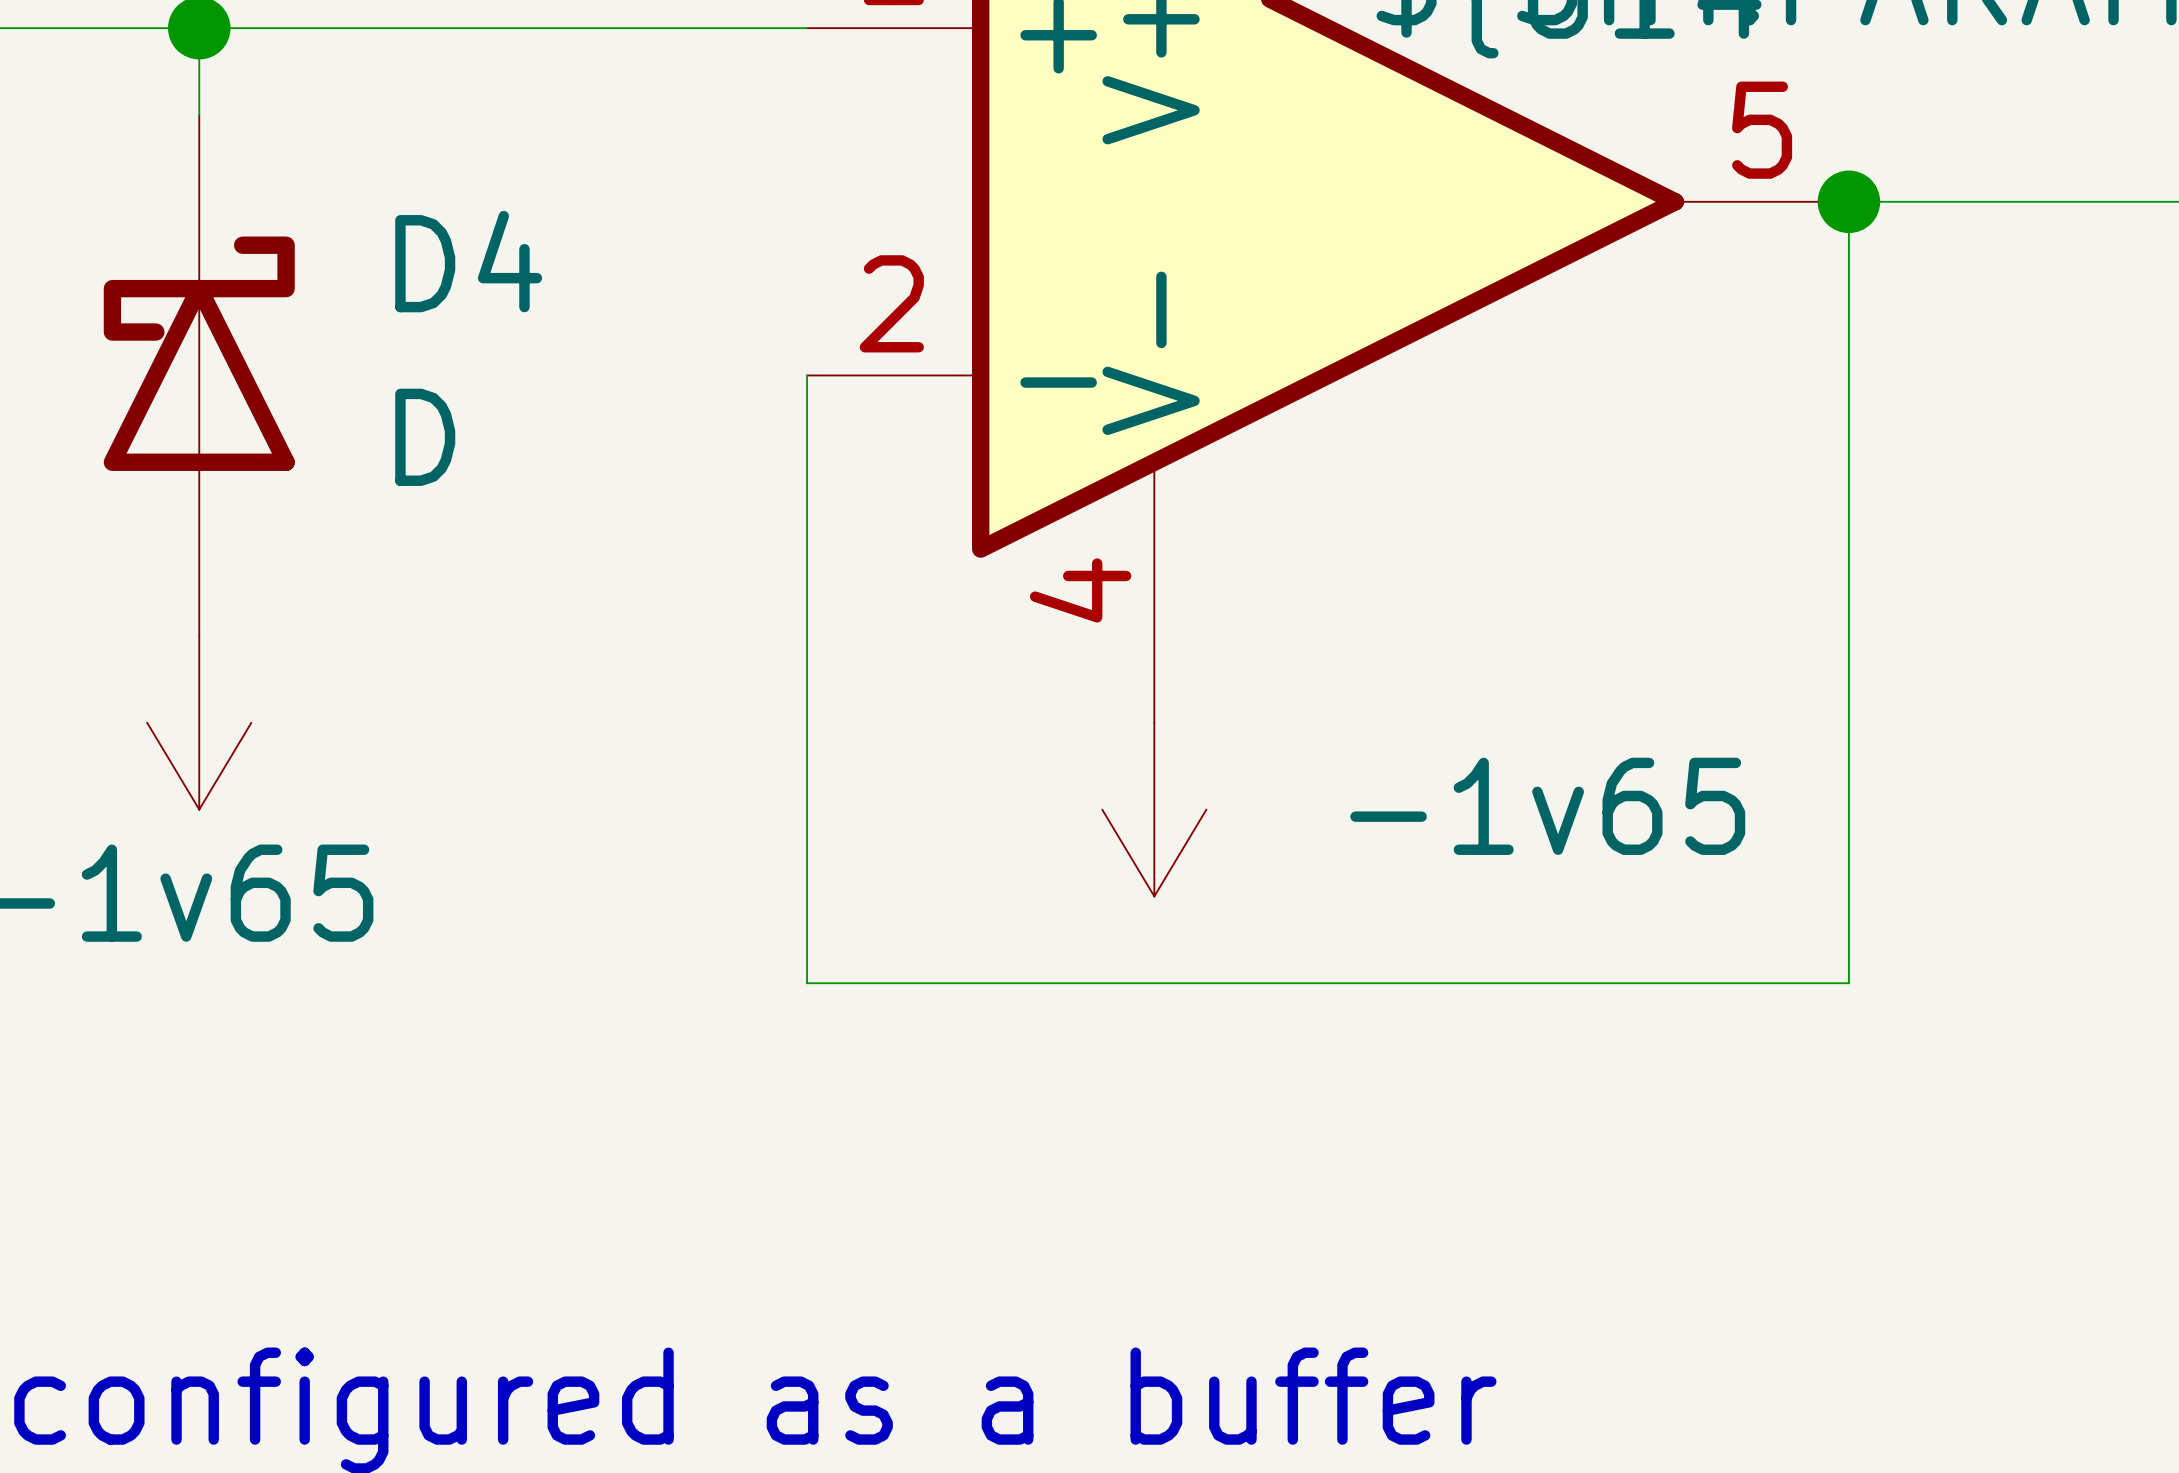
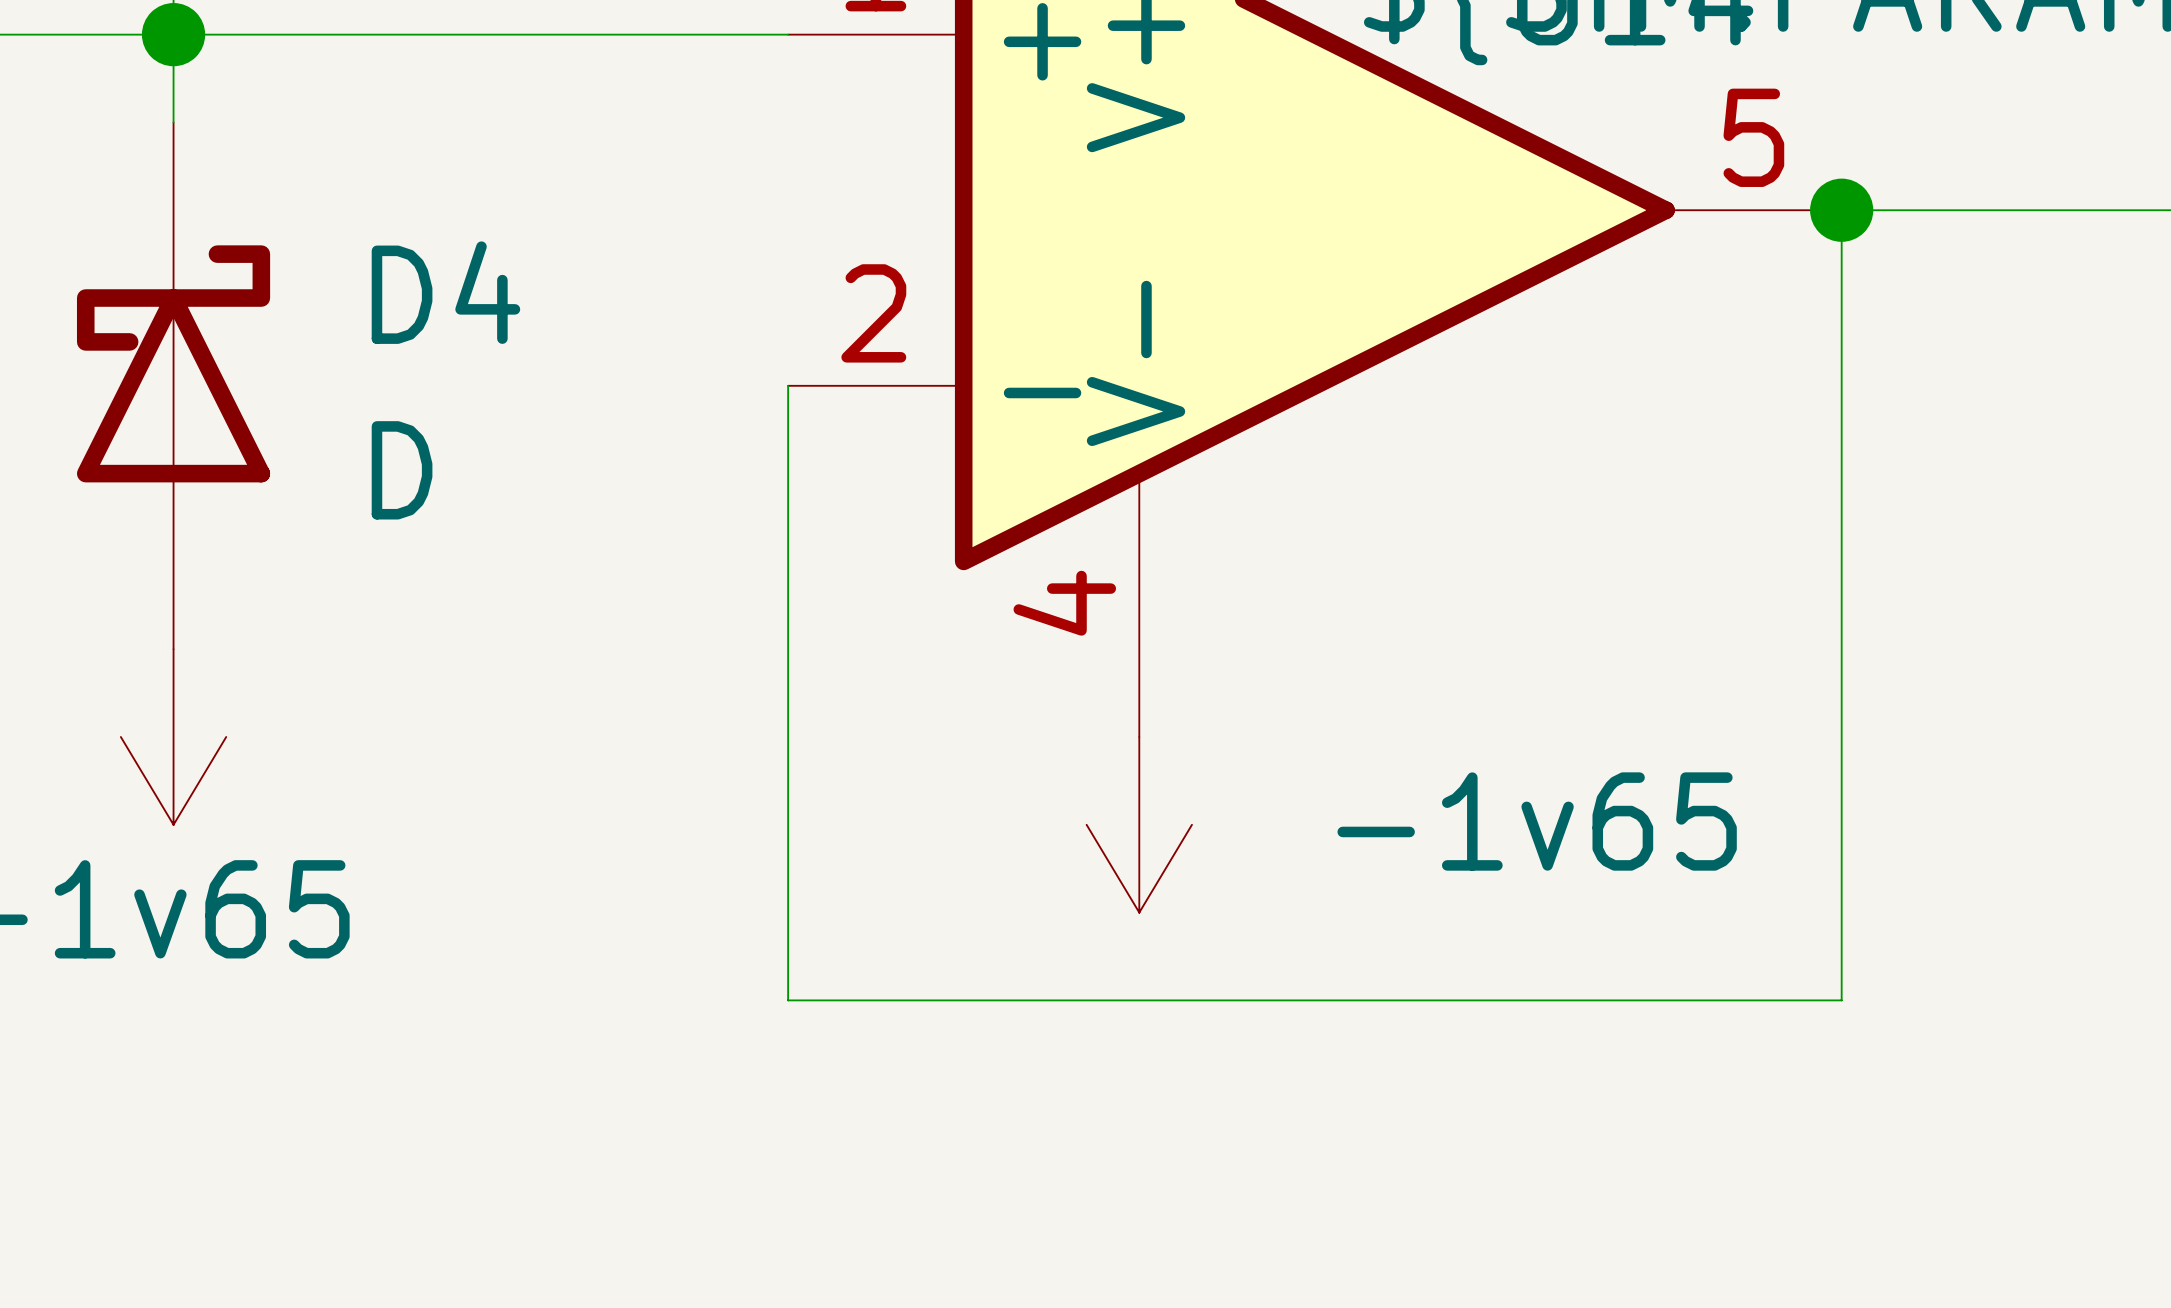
D4 name position: D4 (468, 261) -> D4 (445, 292)
D4 value position: D (425, 437) -> D (402, 470)

